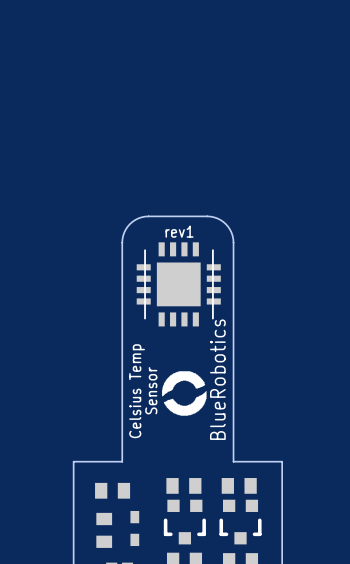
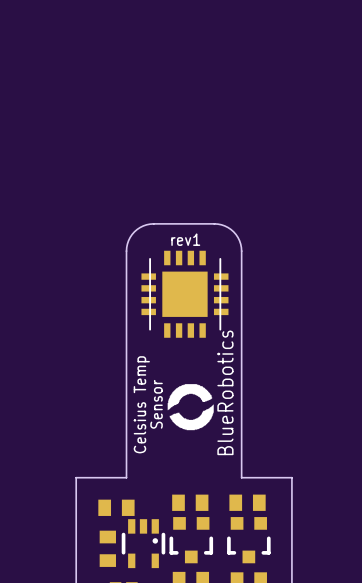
part footprint: [130, 510, 140, 547] -> [121, 519, 166, 569]

